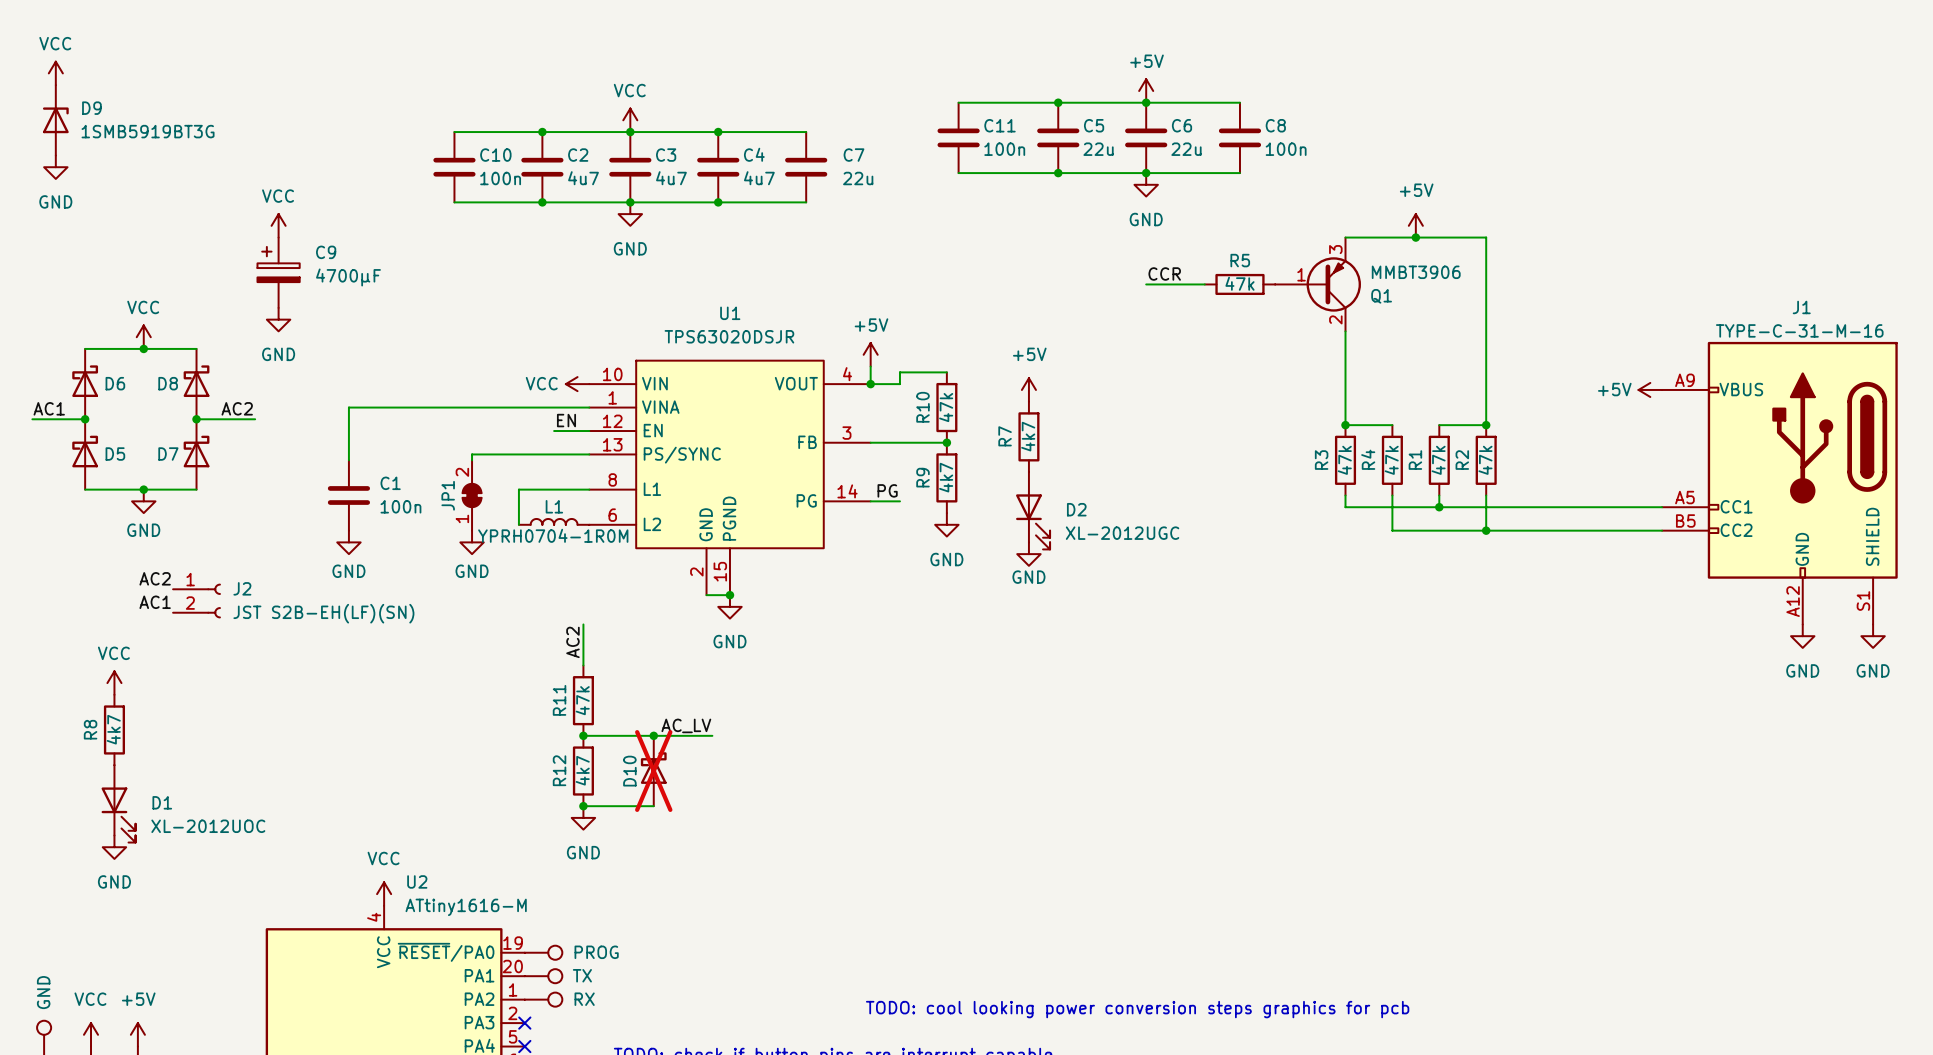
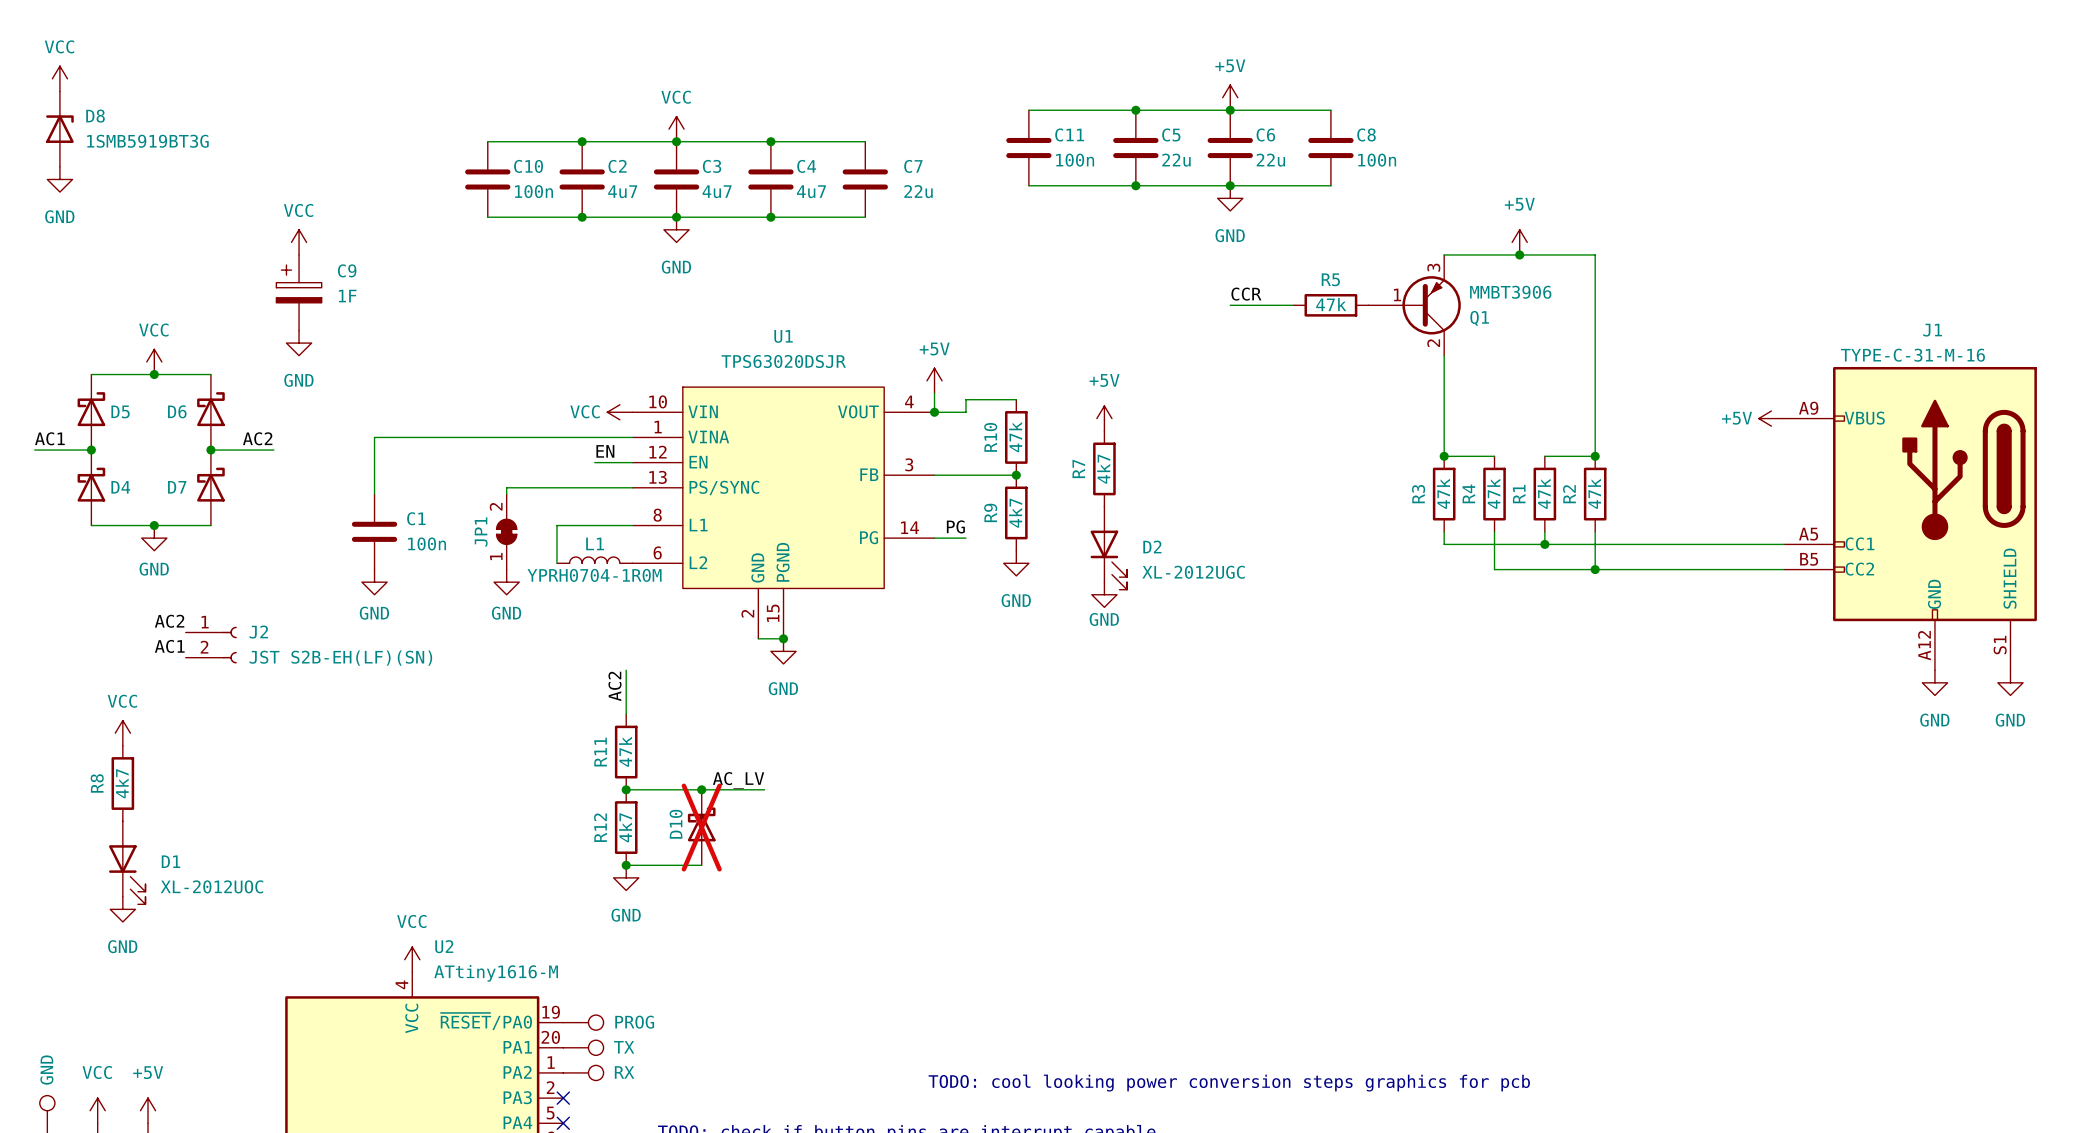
D9 name: D9 (91, 108) -> D8 (95, 116)
C9 value: 4700µF (348, 277) -> 1F (347, 296)
D6 name: D6 (115, 383) -> D5 (120, 411)
D8 name: D8 (168, 383) -> D6 (177, 411)
D5 name: D5 (115, 454) -> D4 (120, 487)

